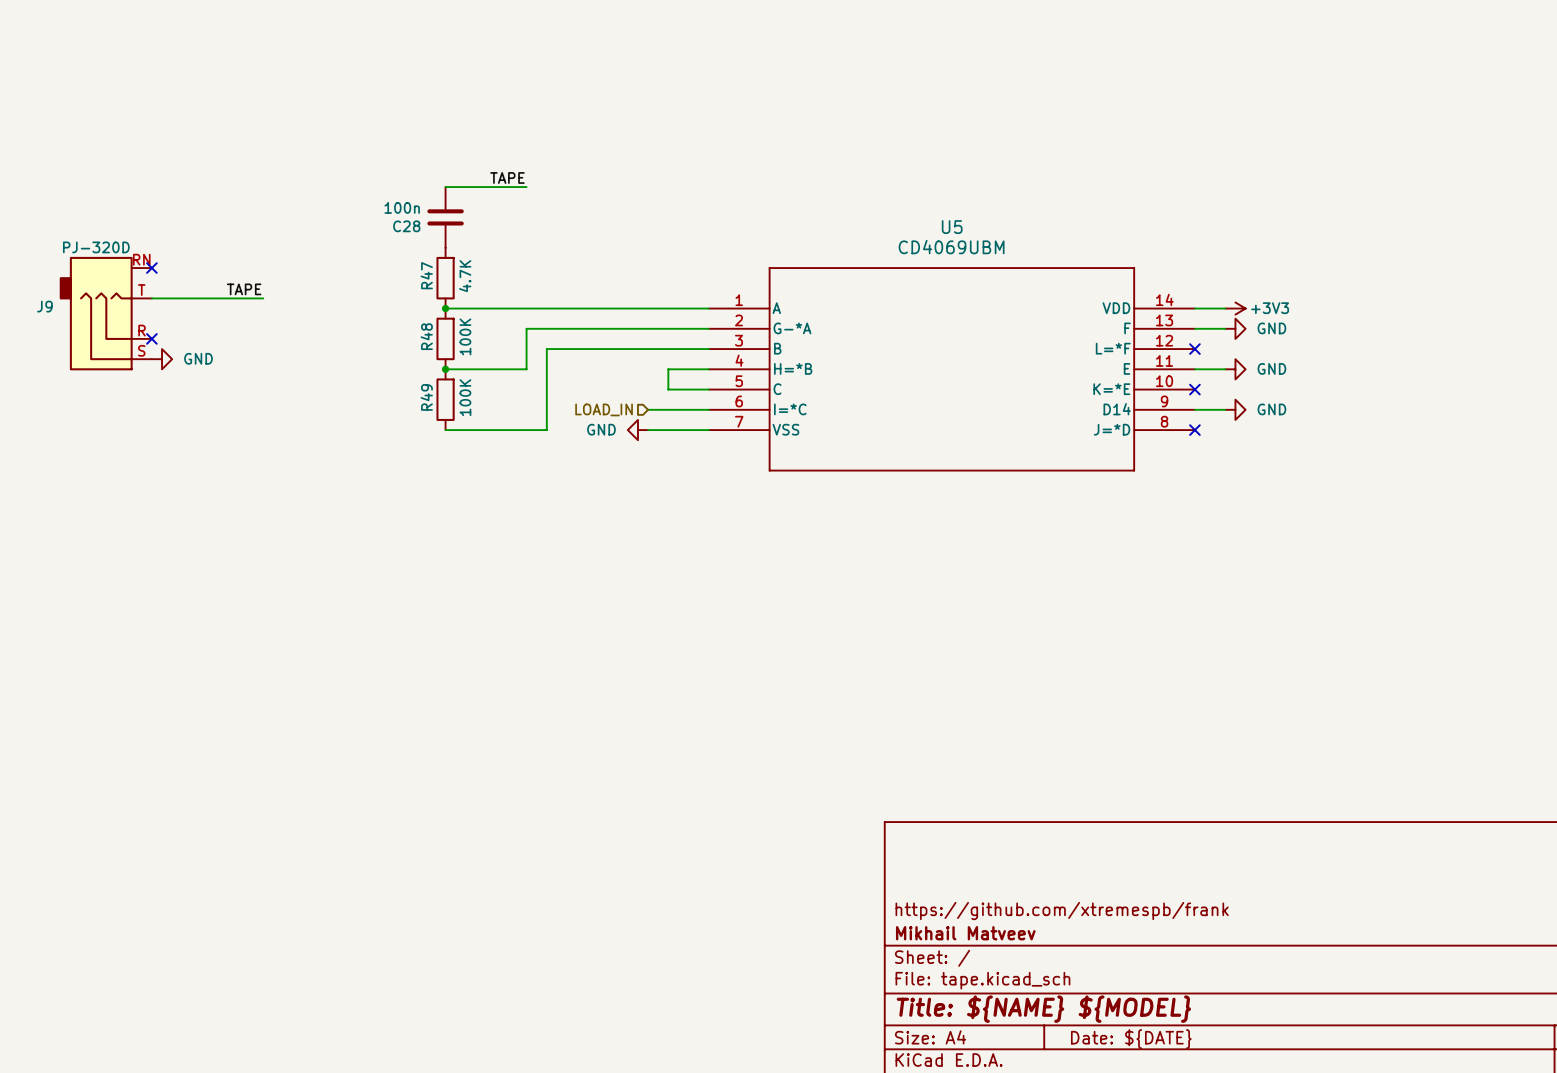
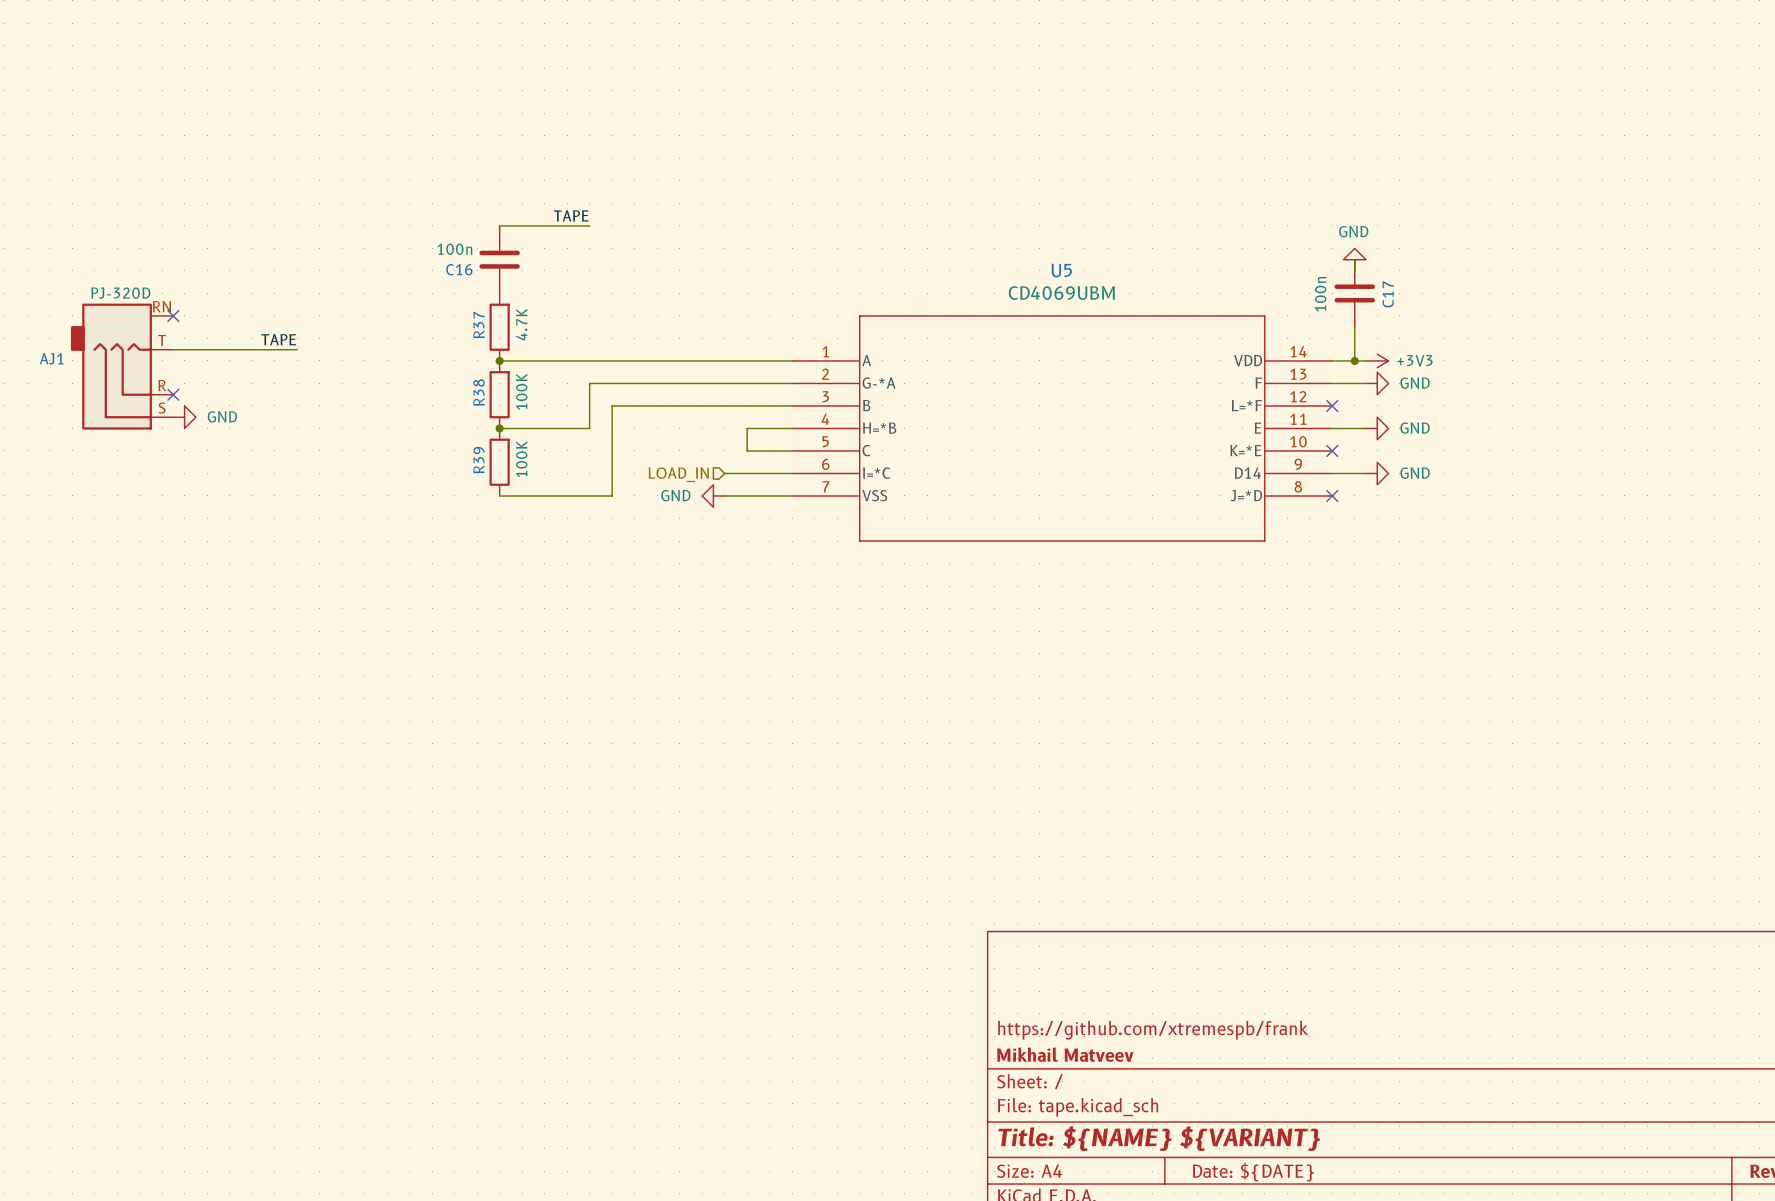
wire: none -> (1354, 259) (1354, 270)
power symbol: none -> GND (1354, 259)
C28 name: C28 (406, 226) -> C16 (459, 269)
C17: none -> 100n (1354, 293)
R47 name: R47 (426, 275) -> R37 (478, 325)
wire: none -> (1354, 327) (1354, 360)
J9 name: J9 (44, 306) -> AJ1 (51, 358)
junction: none -> (1354, 360)
R48 name: R48 (426, 336) -> R38 (479, 392)
R49 name: R49 (426, 397) -> R39 (479, 460)
title block: Title: ${NAME} ${MODEL} (1043, 1009) -> Title: ${NAME} ${VARIANT} (1159, 1138)

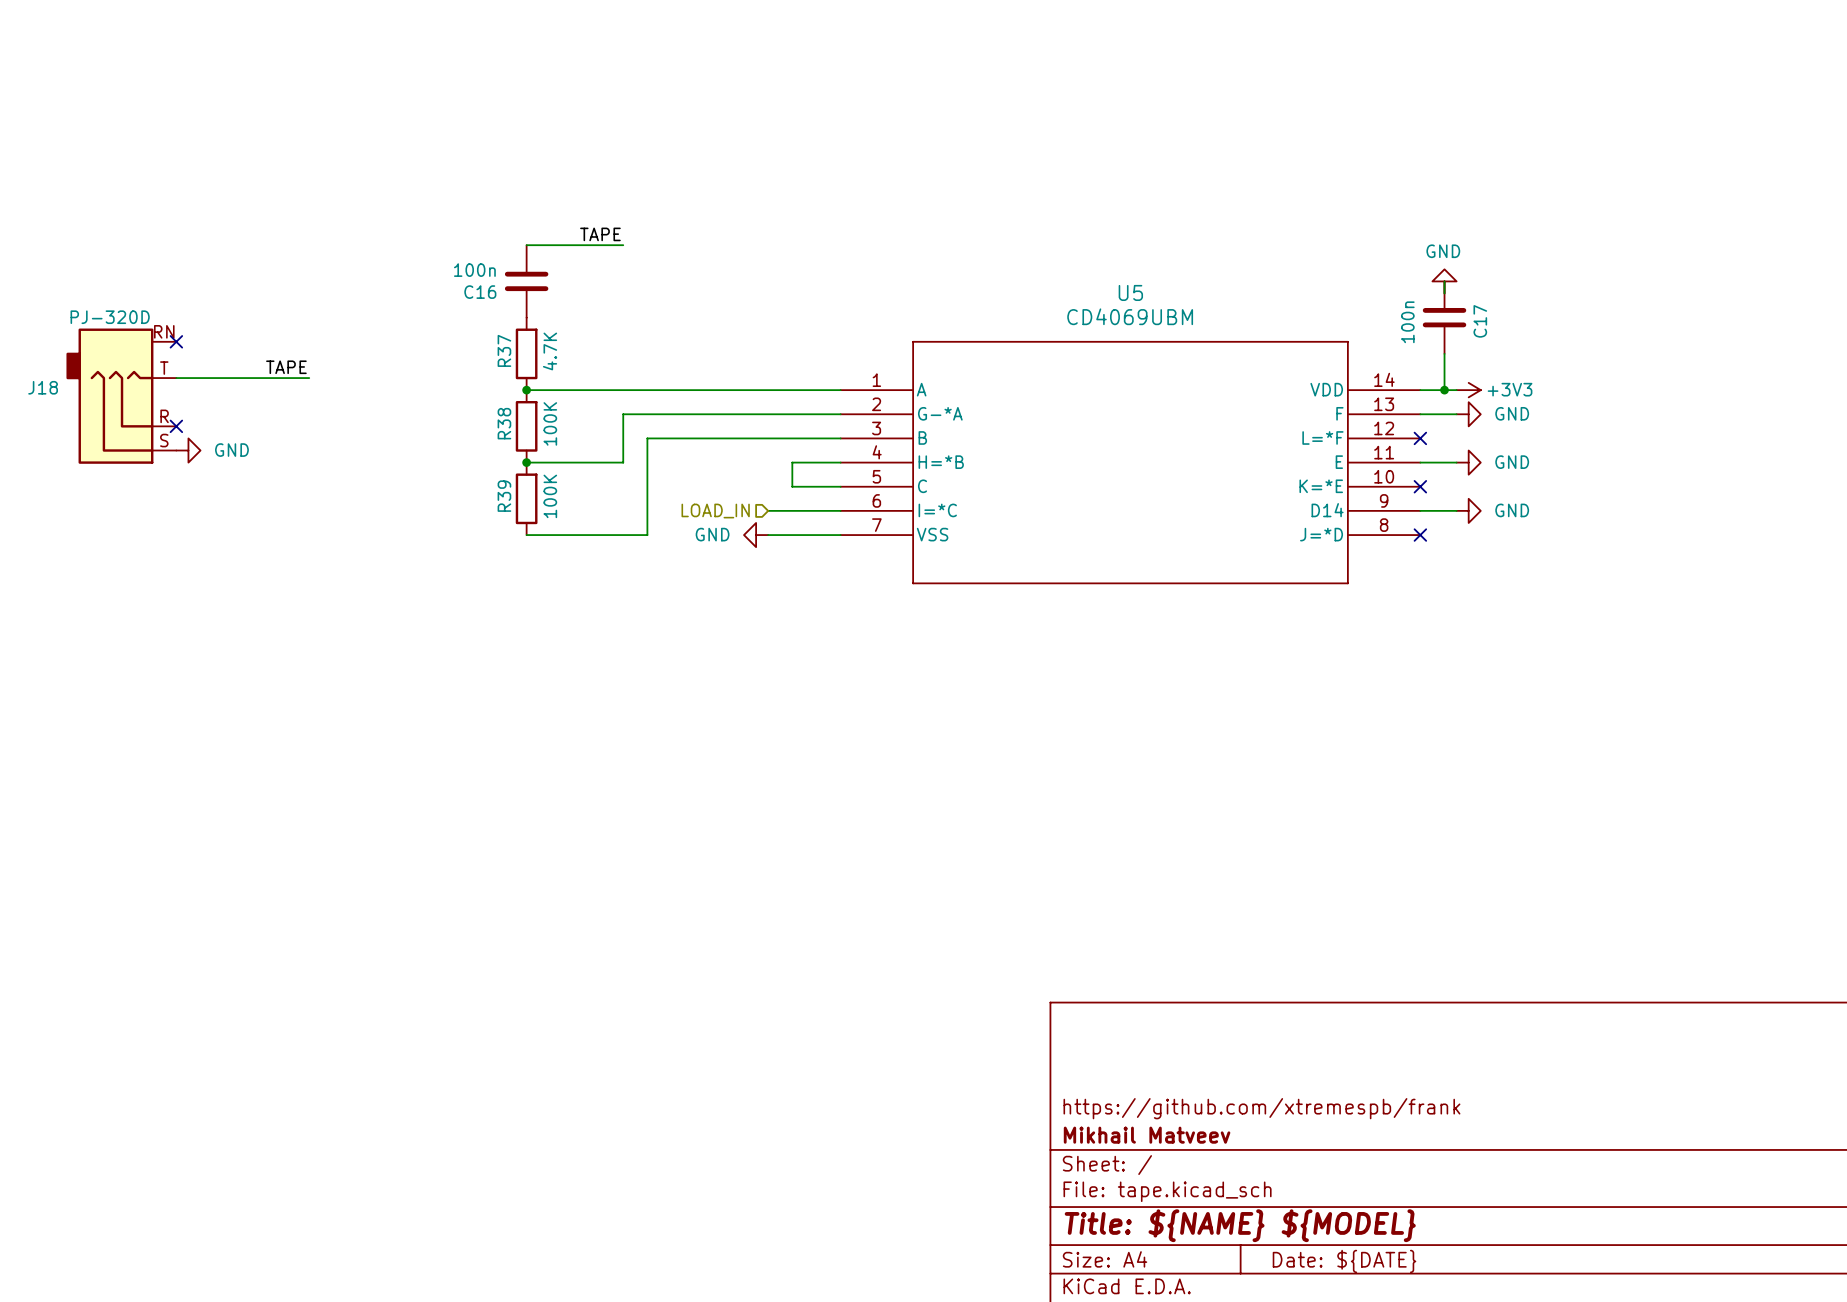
AJ1 name: AJ1 (51, 358) -> J18 (43, 387)
title block: Title: ${NAME} ${VARIANT} (1159, 1138) -> Title: ${NAME} ${MODEL} (1240, 1225)

